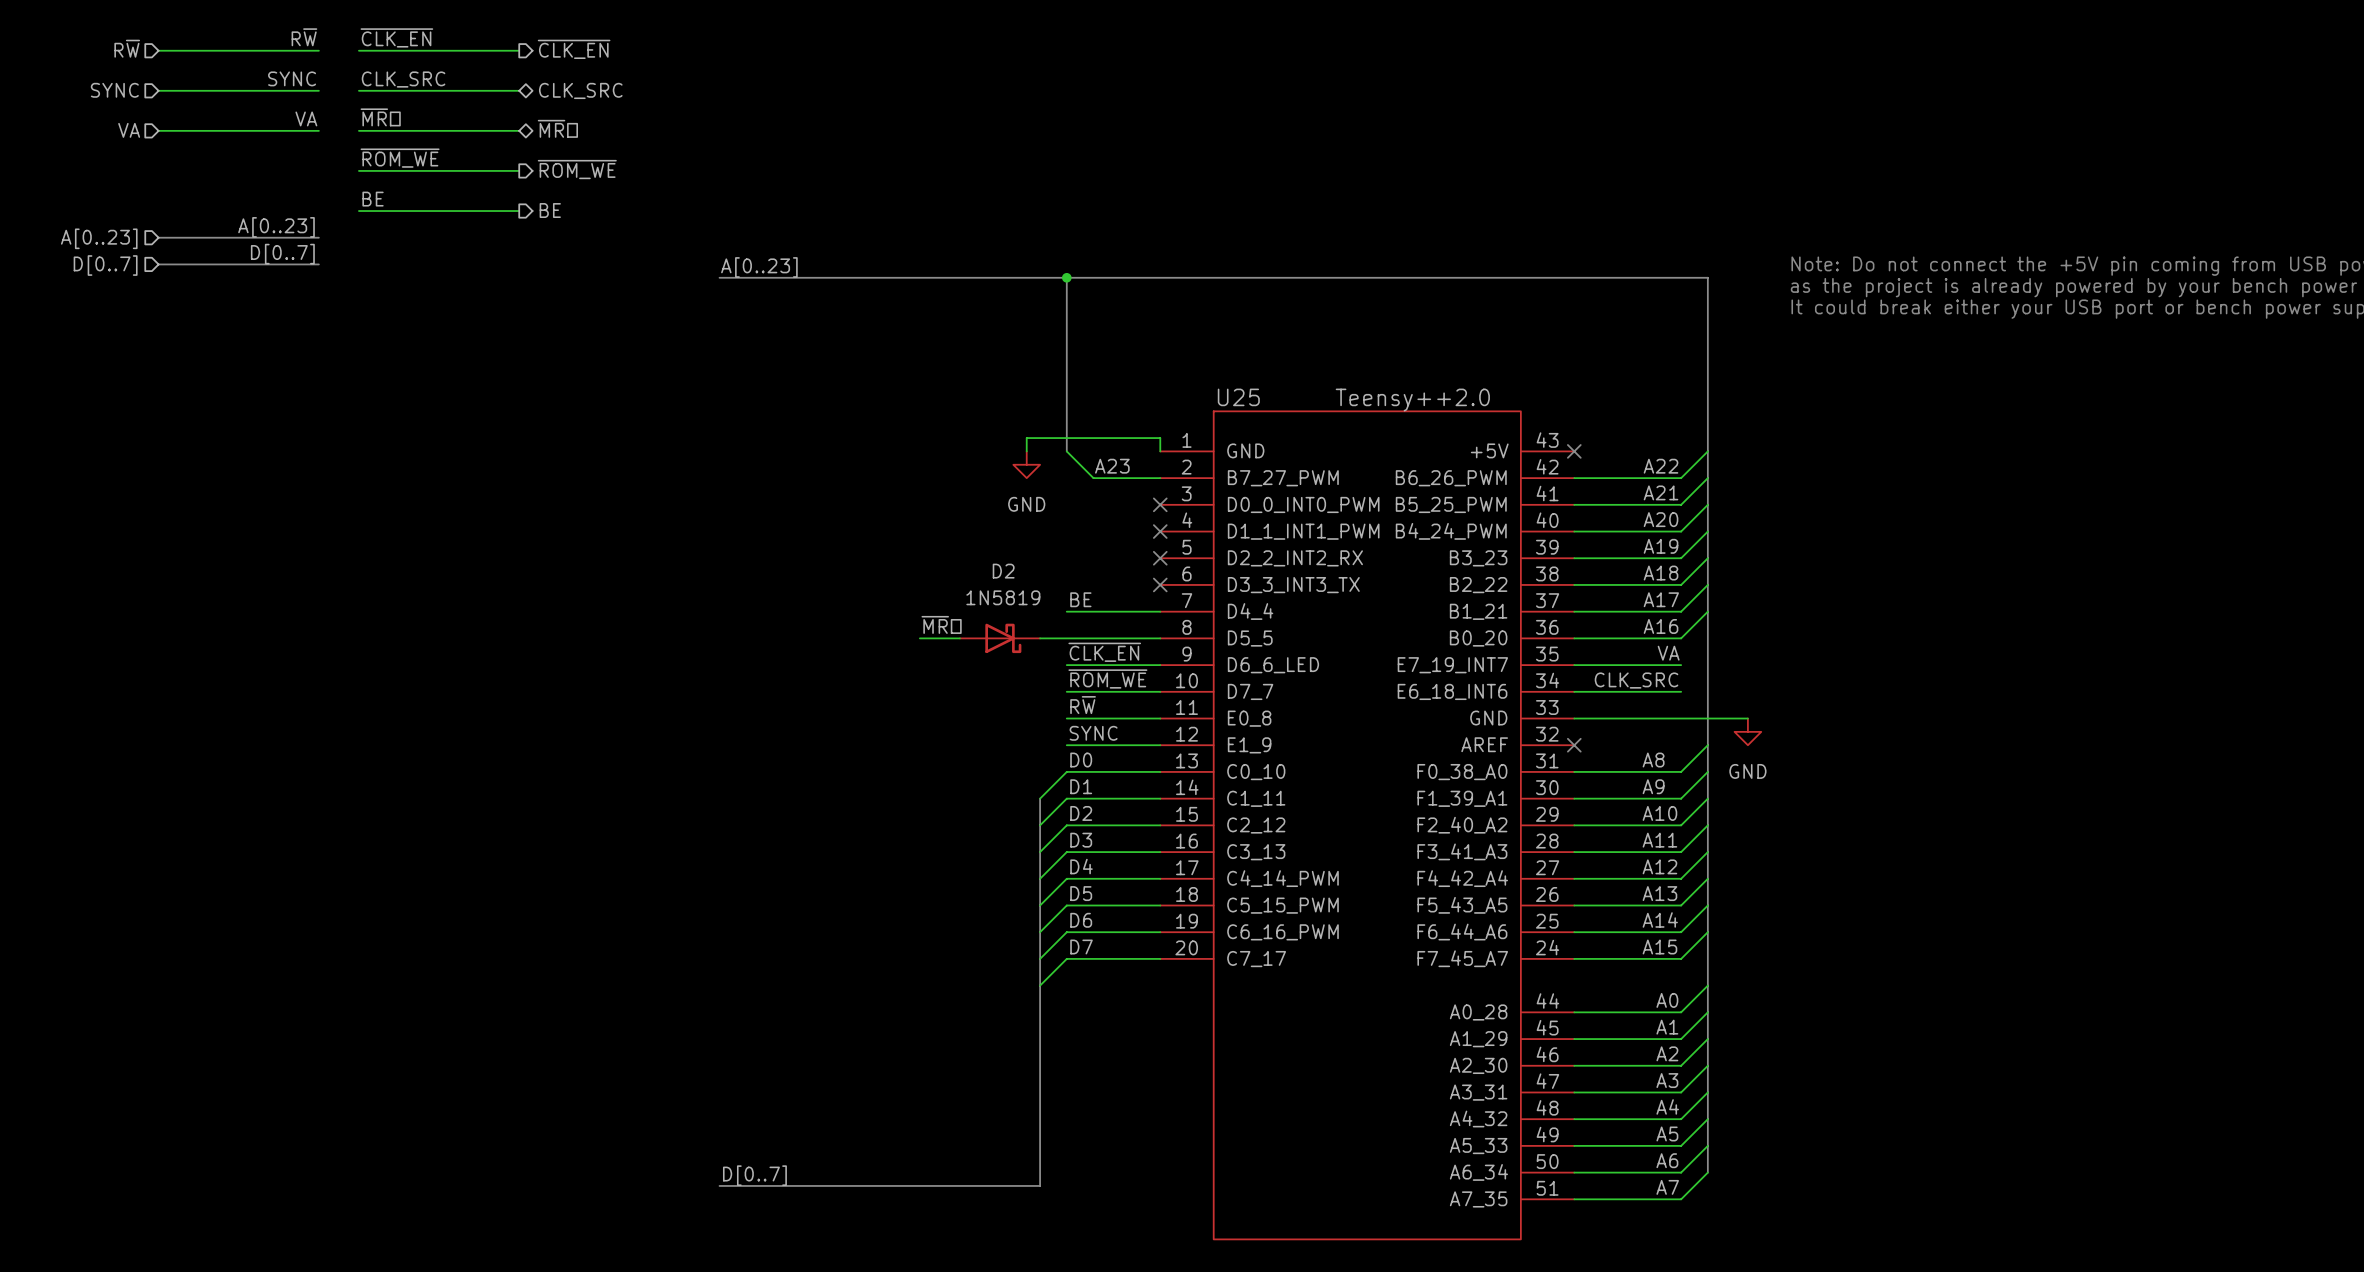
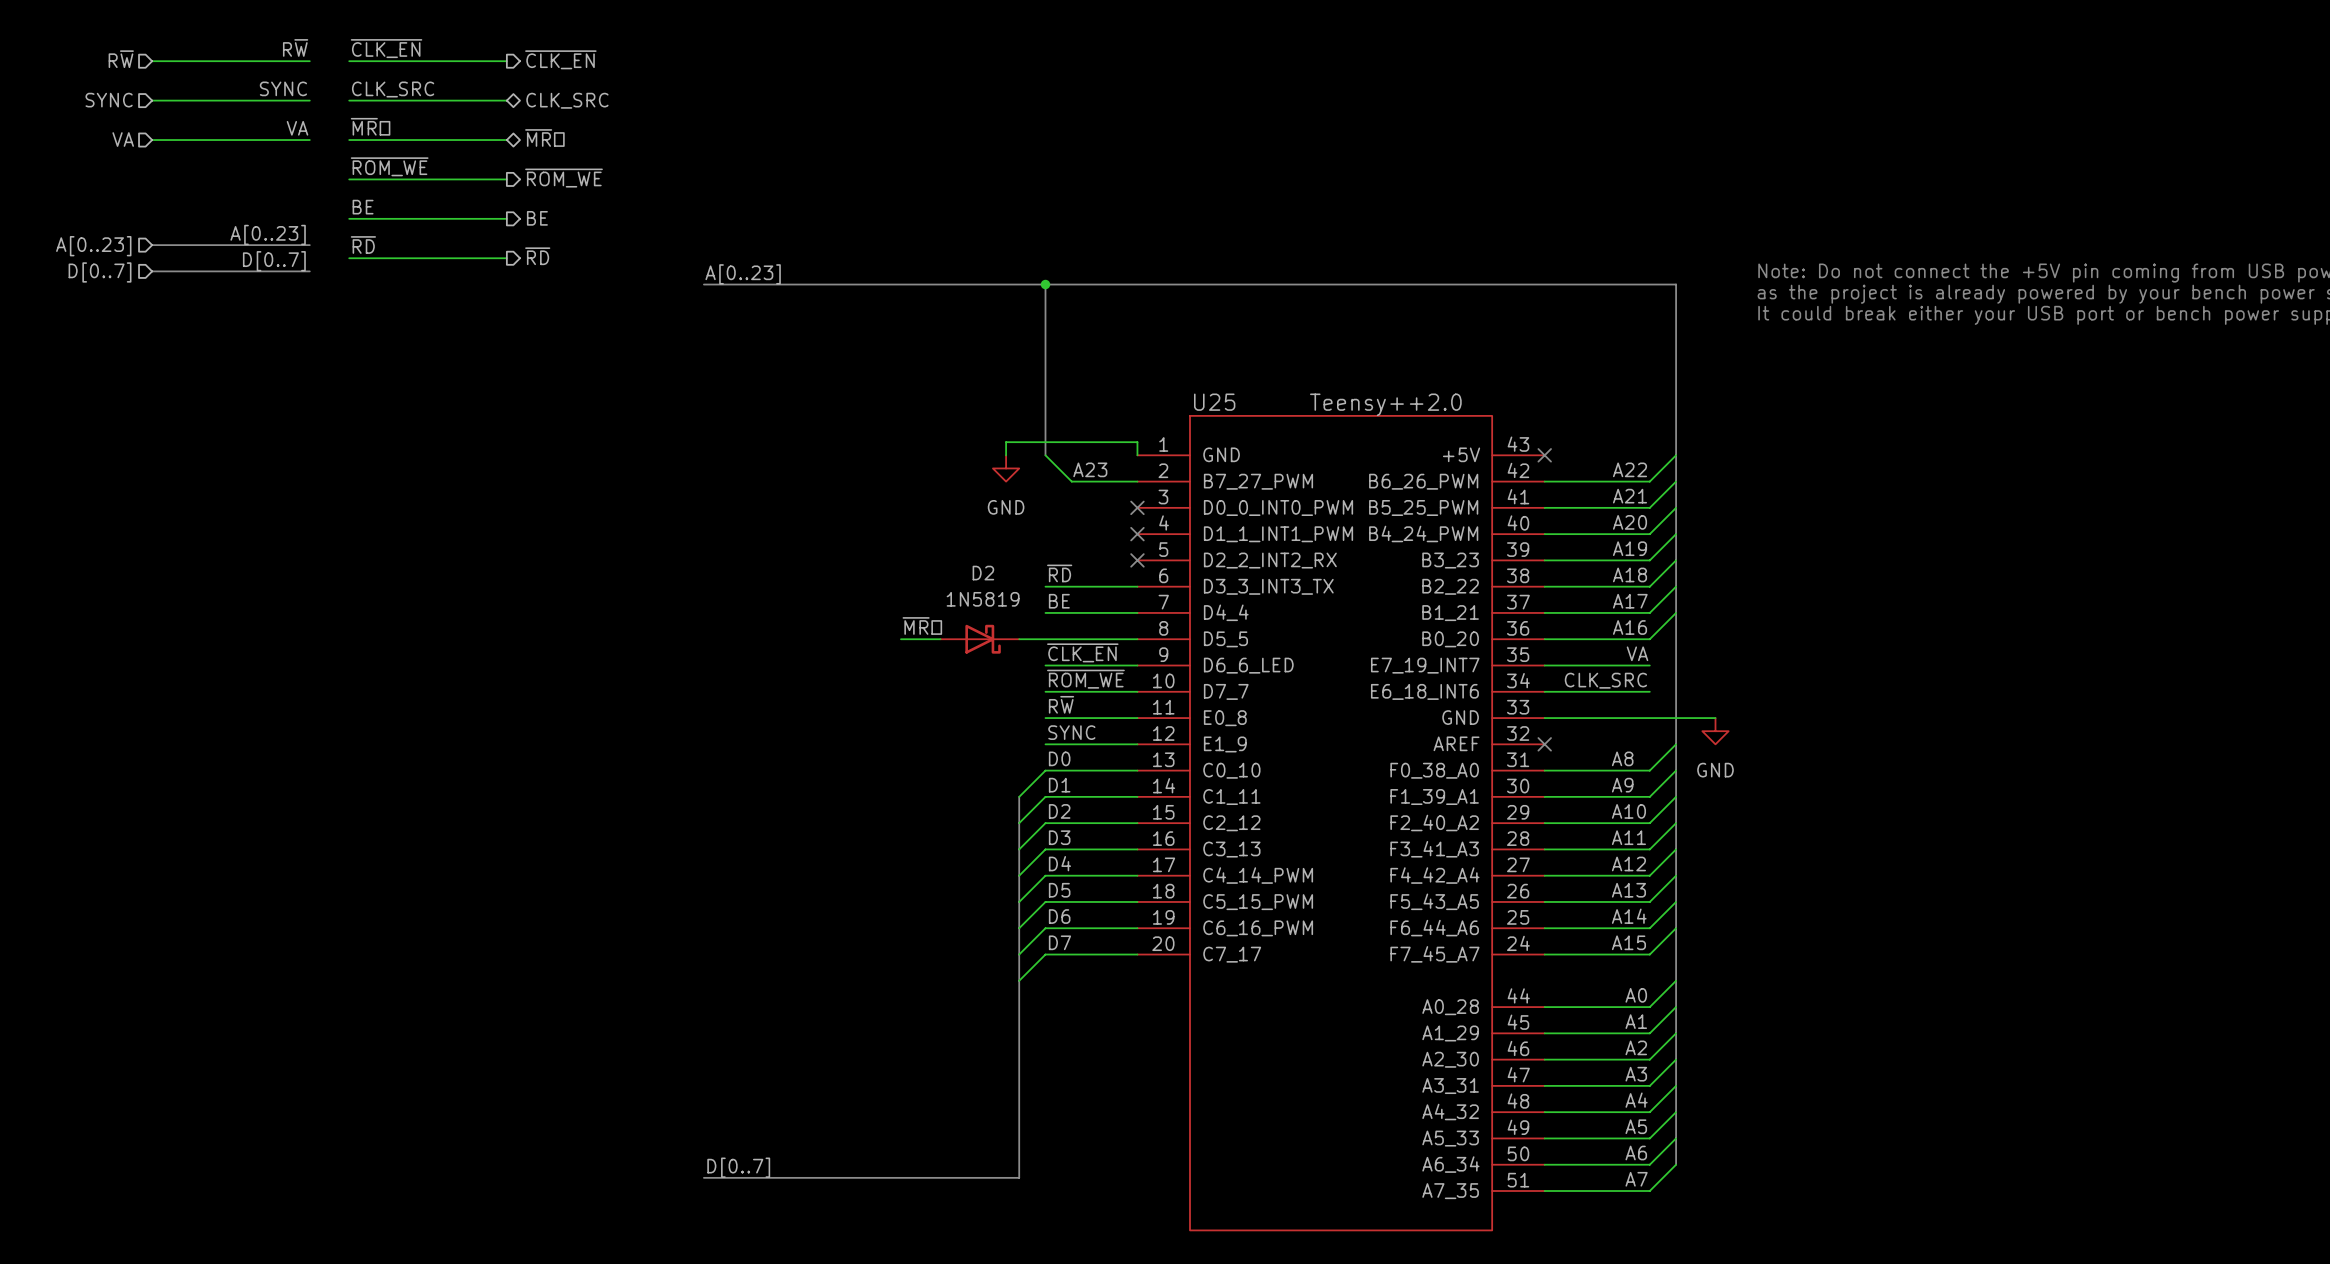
label: none -> ~{RD} (363, 245)
hierarchical label: none -> ~{RD} (537, 256)
wire: none -> (349, 258) (506, 258)
label: none -> ~{RD} (1059, 573)
wire: none -> (1045, 586) (1137, 586)
no-connect mark: (1160, 584) -> none

